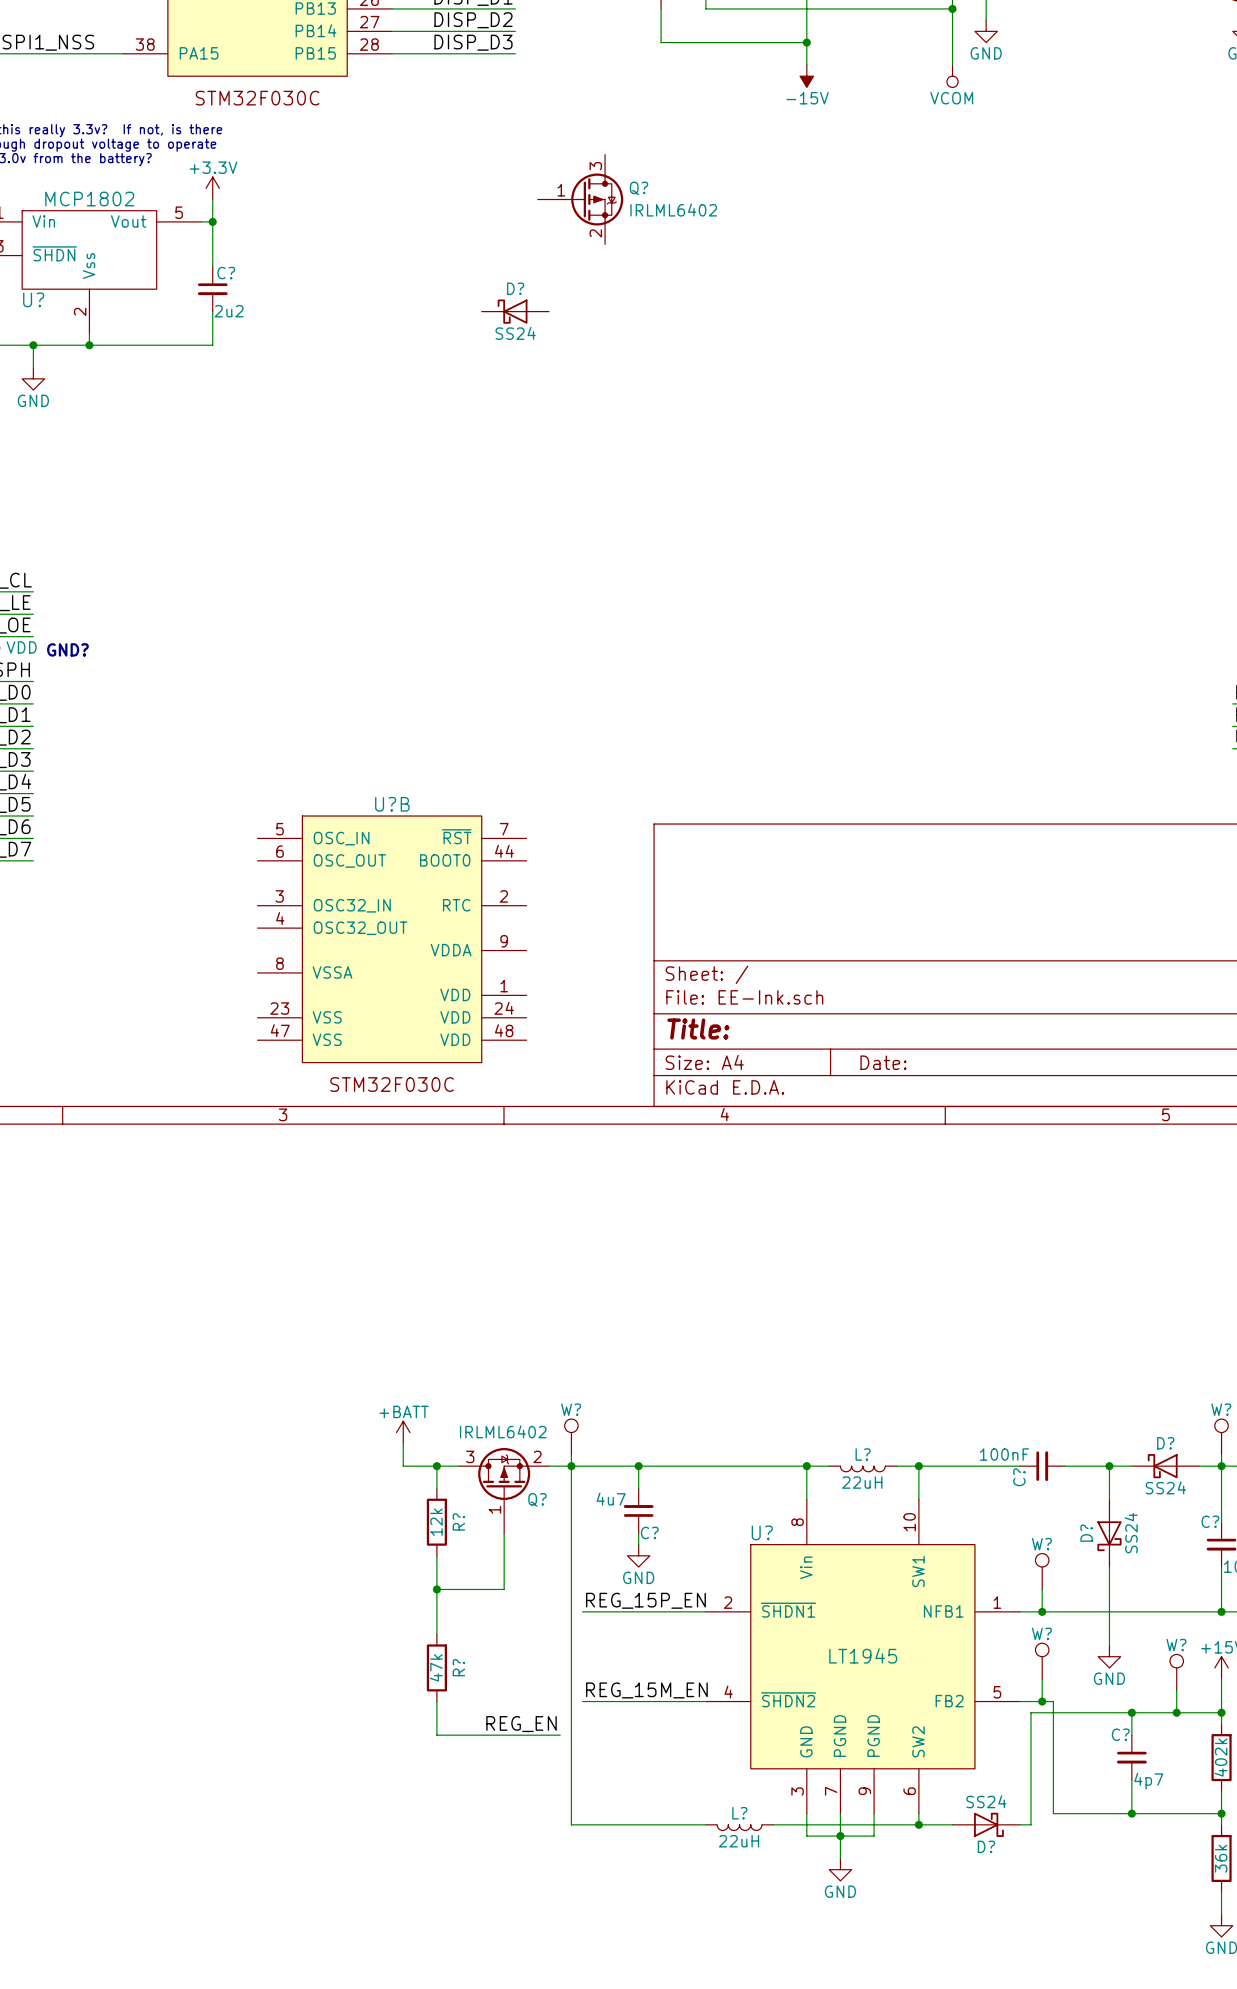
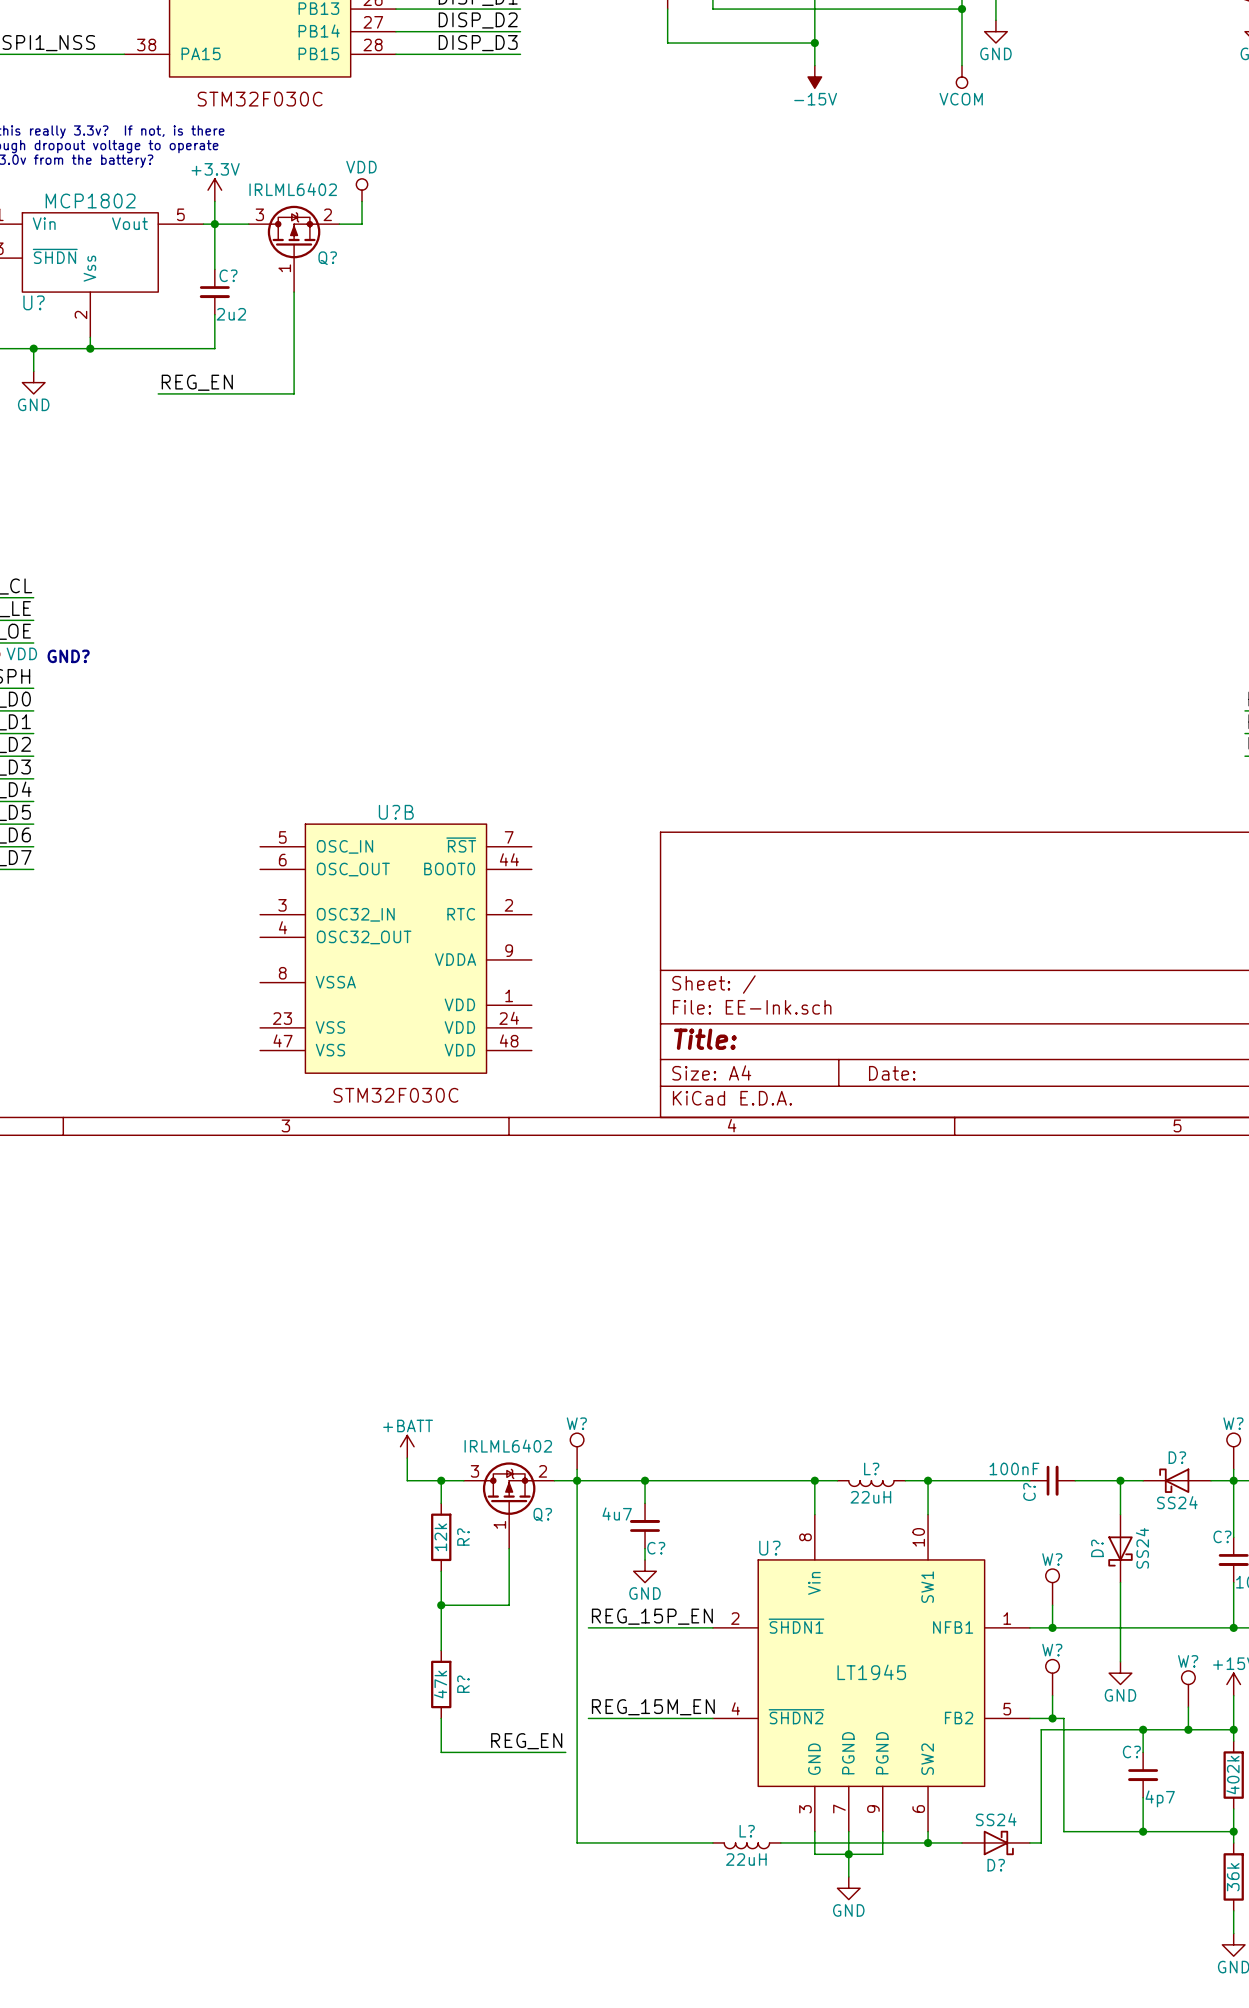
power symbol: none -> VDD (362, 190)
wire: none -> (362, 201) (362, 224) (339, 224)
Q?: IRLML6402 (580, 199) -> none
wire: none -> (214, 224) (248, 224)
Q?: none -> IRLML6402 (294, 248)
wire: none -> (294, 292) (294, 393) (158, 393)
D?: SS24 (515, 311) -> none
label: none -> REG_EN (197, 382)

